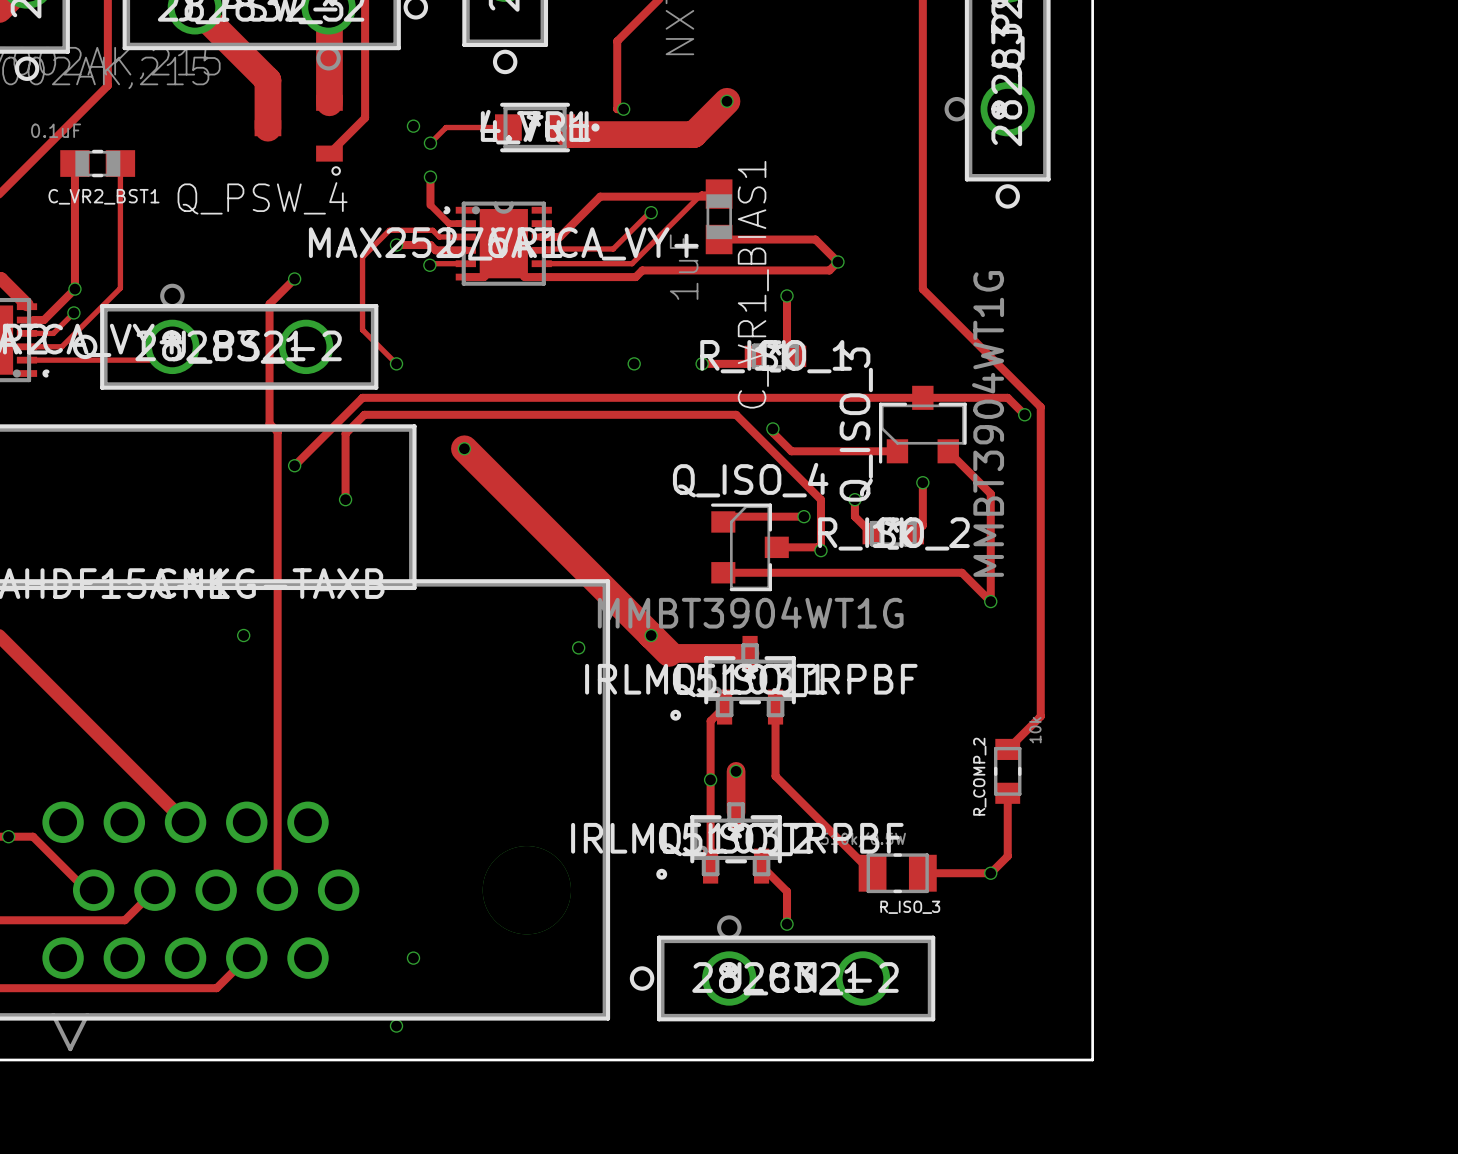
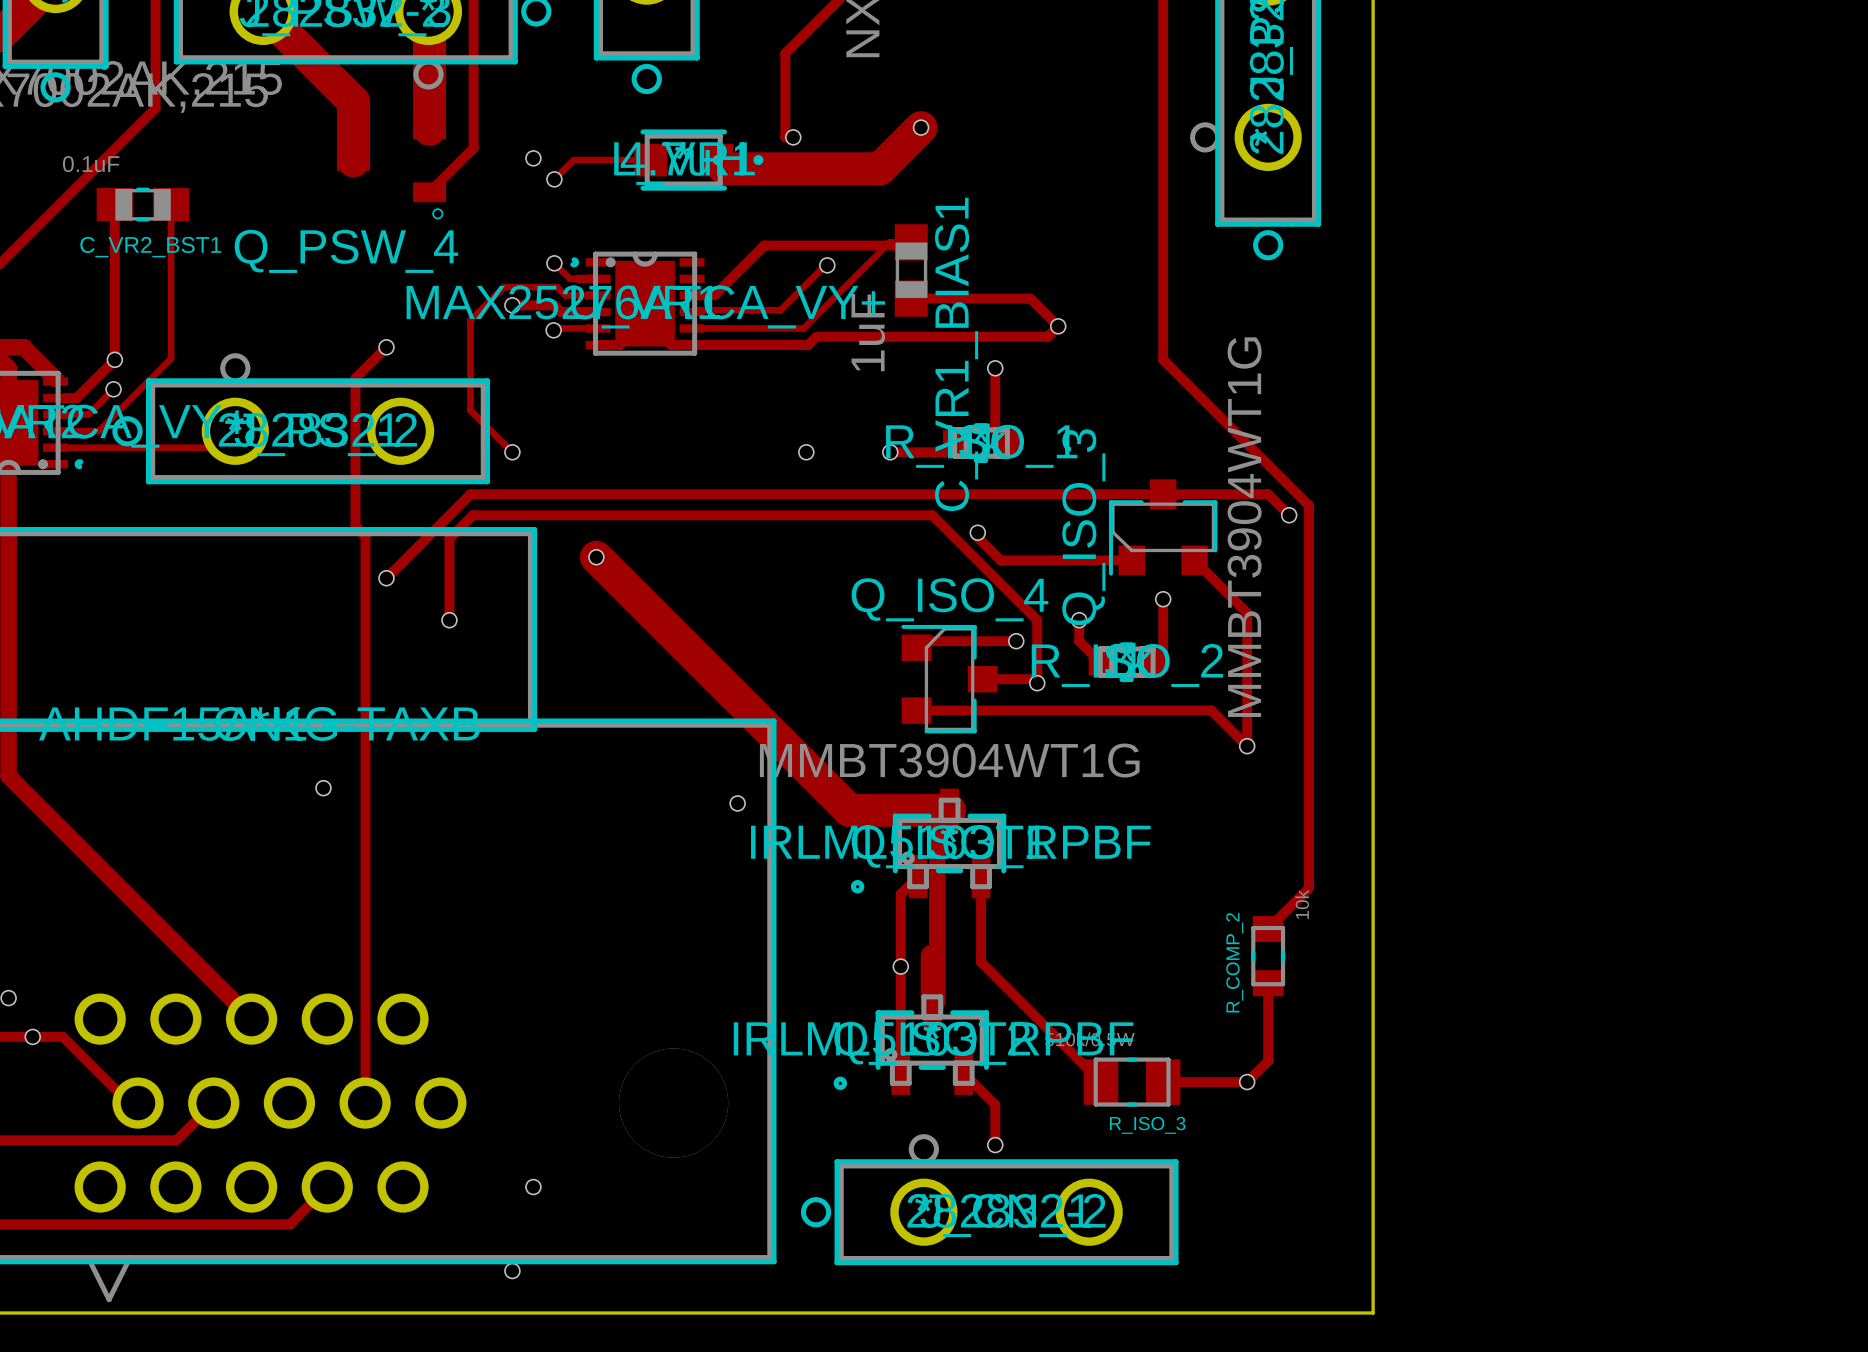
track: (430, 177) (430, 205) (449, 223) -> (554, 263) (569, 278) (577, 278)
via position: (430, 177) -> (554, 263)
via: (651, 635) -> none
track width: thin (669, 653) (750, 653) -> thick (849, 810) (949, 810)
track: none -> (949, 810) (937, 822) (937, 1001)
via: (736, 771) -> none

